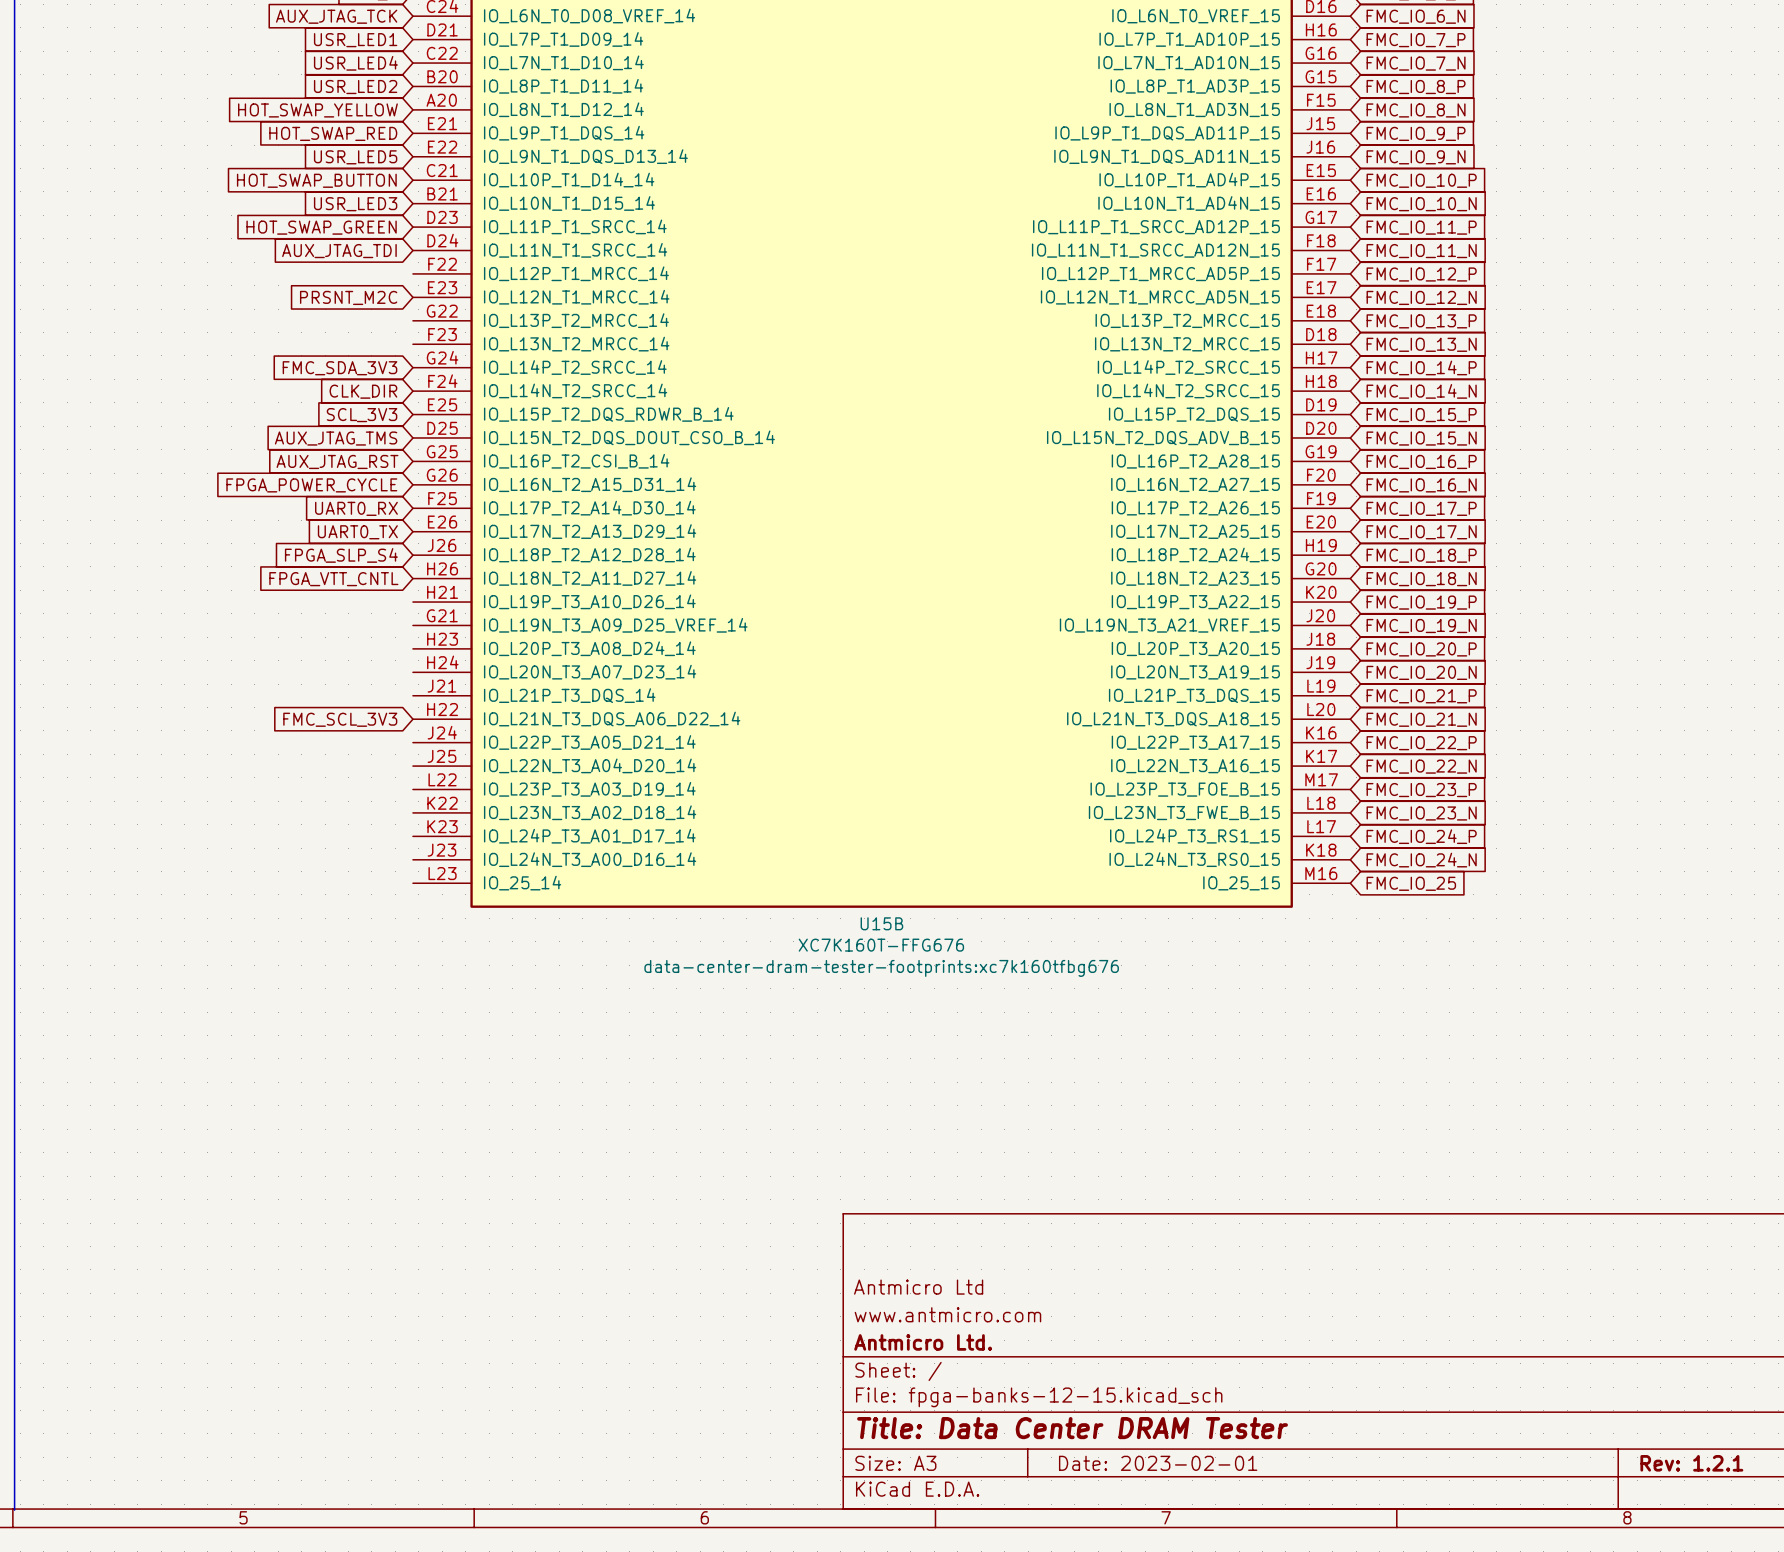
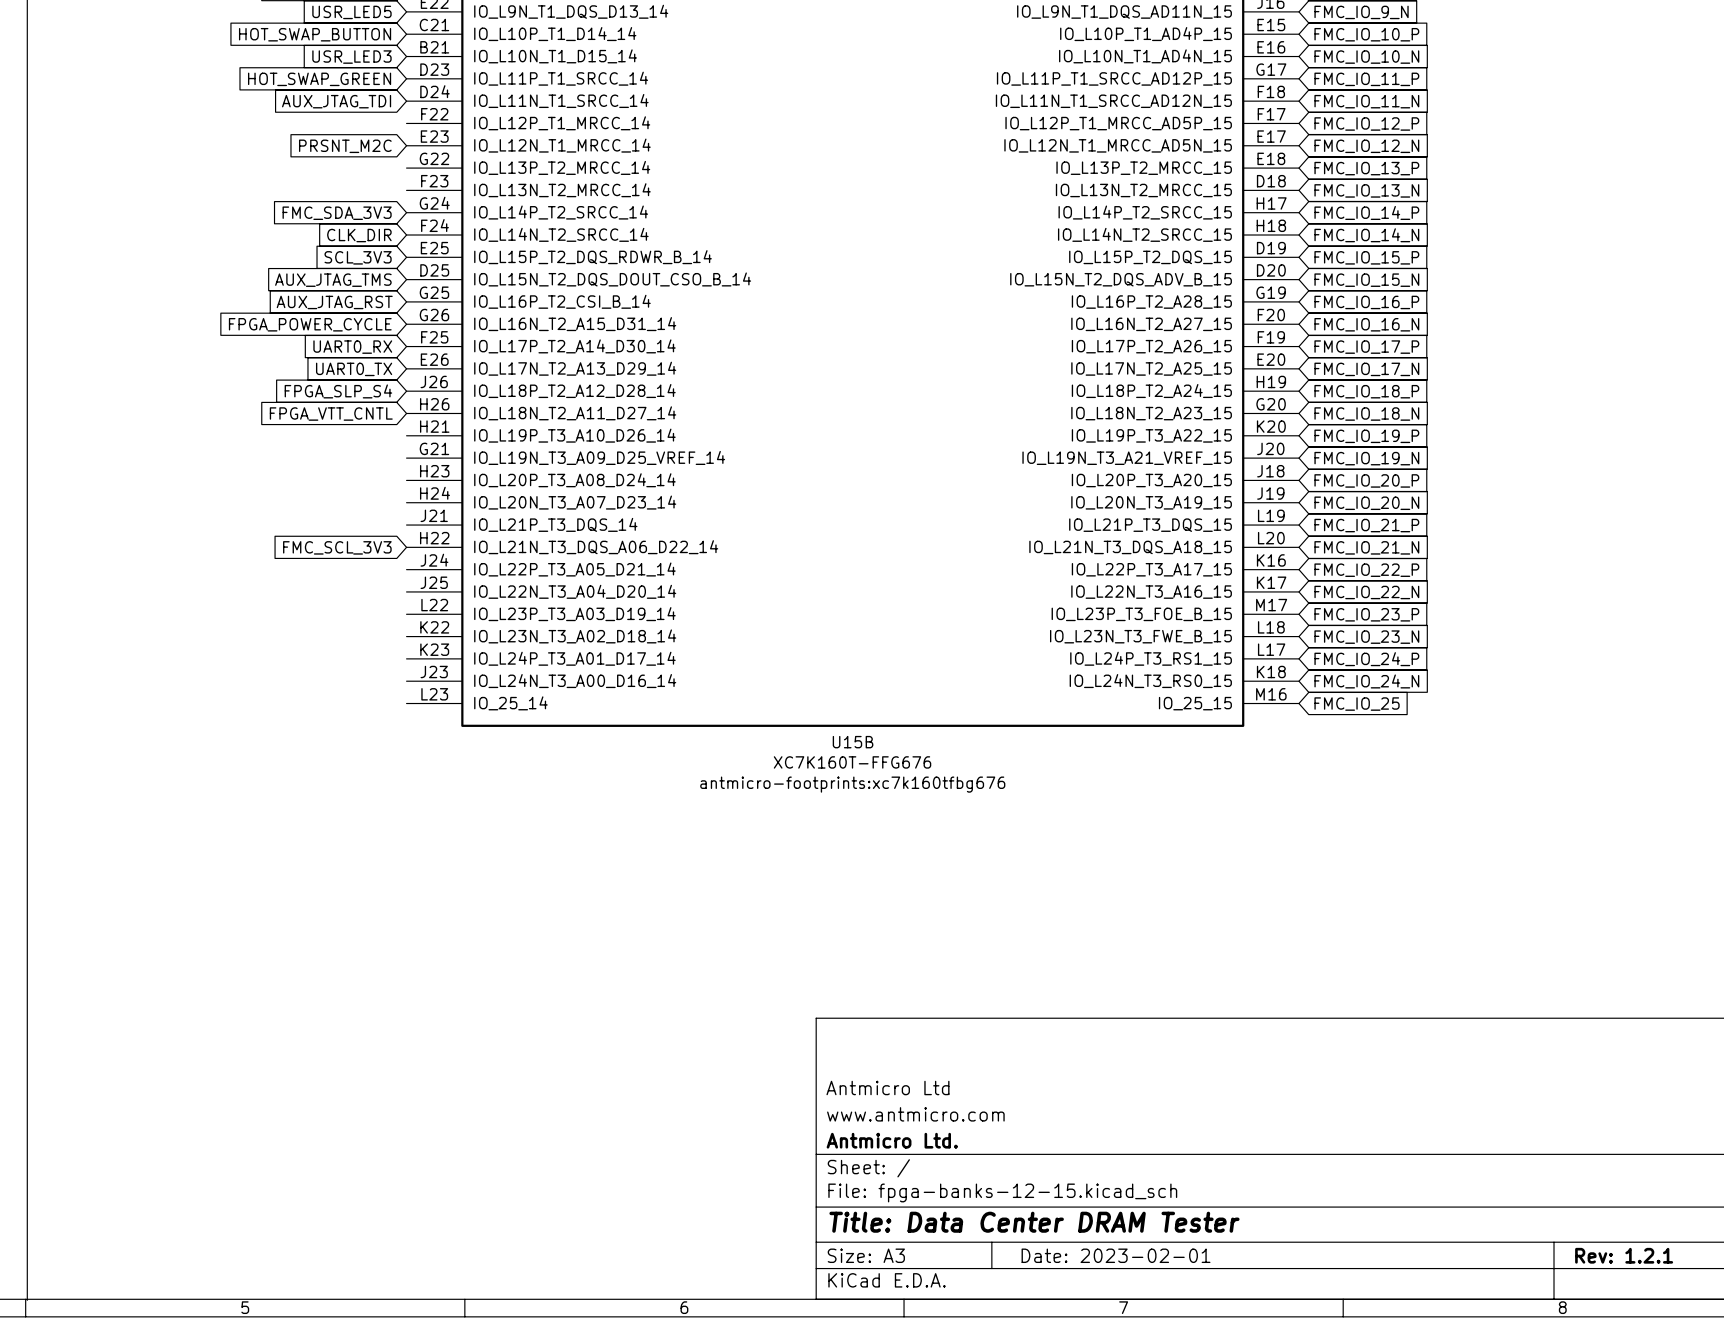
U15B text: data-center-dram-tester-footprints:xc7k160tfbg676 (881, 968) -> antmicro-footprints:xc7k160tfbg676 (852, 784)

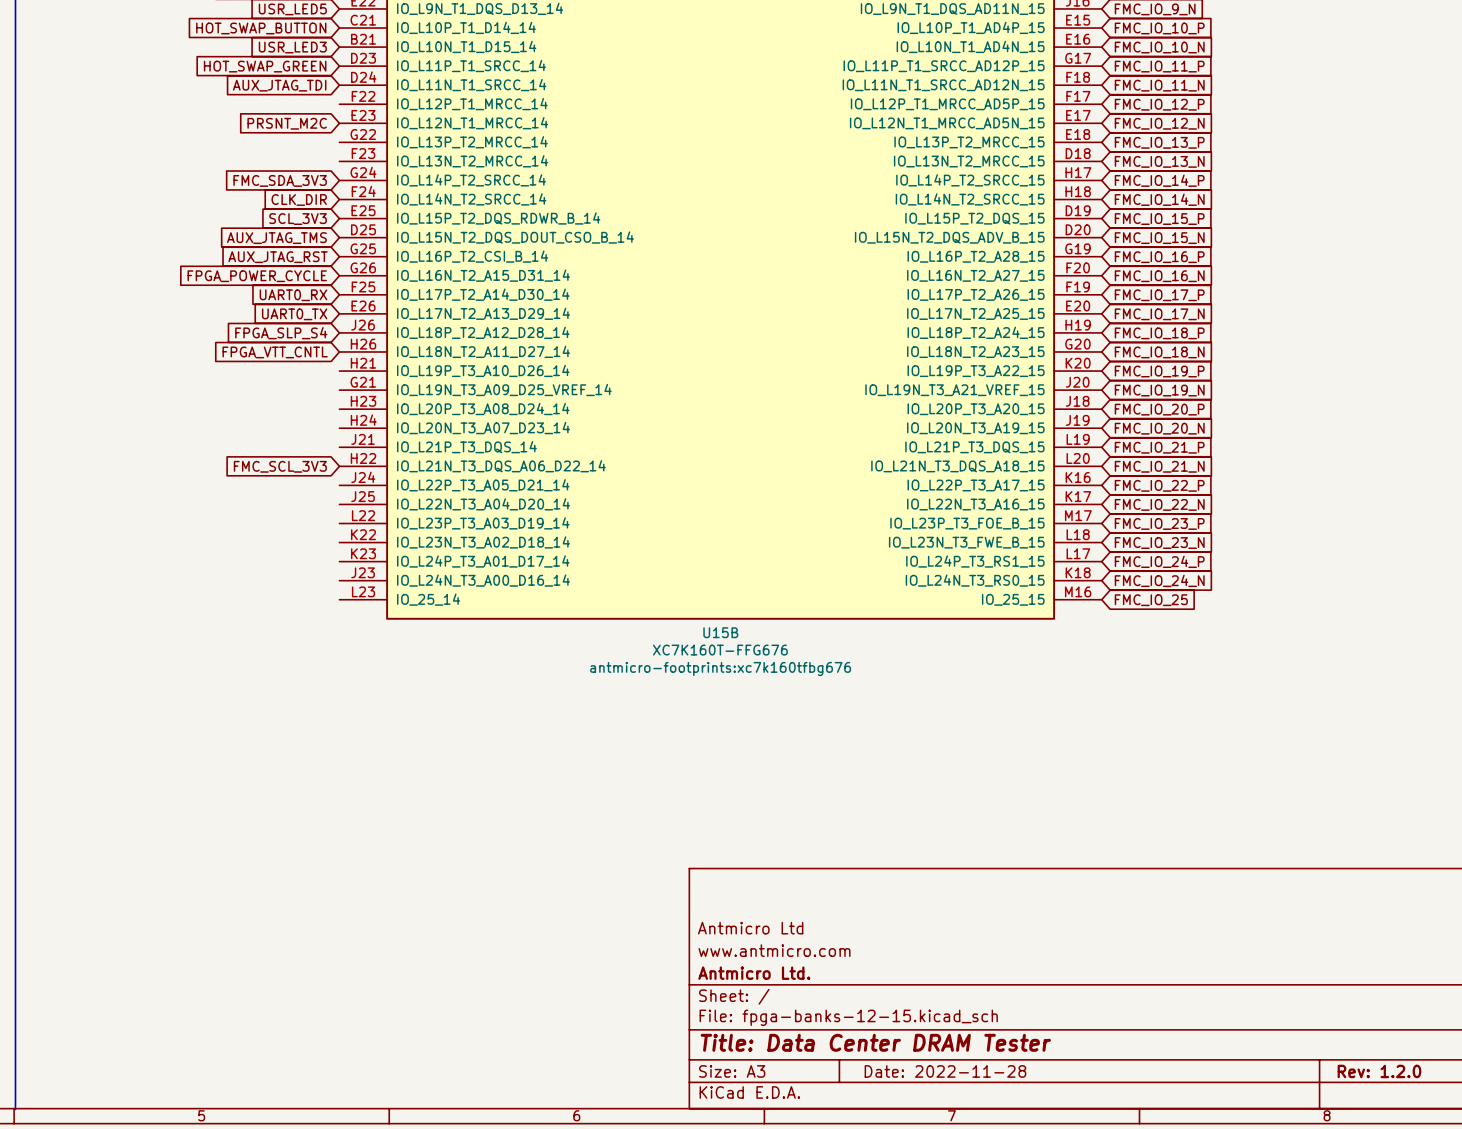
title block: Date: 2023-02-01 (1116, 1255) -> Date: 2022-11-28 (945, 1071)
title block: Rev: 1.2.1 (1624, 1255) -> Rev: 1.2.0 (1379, 1071)

